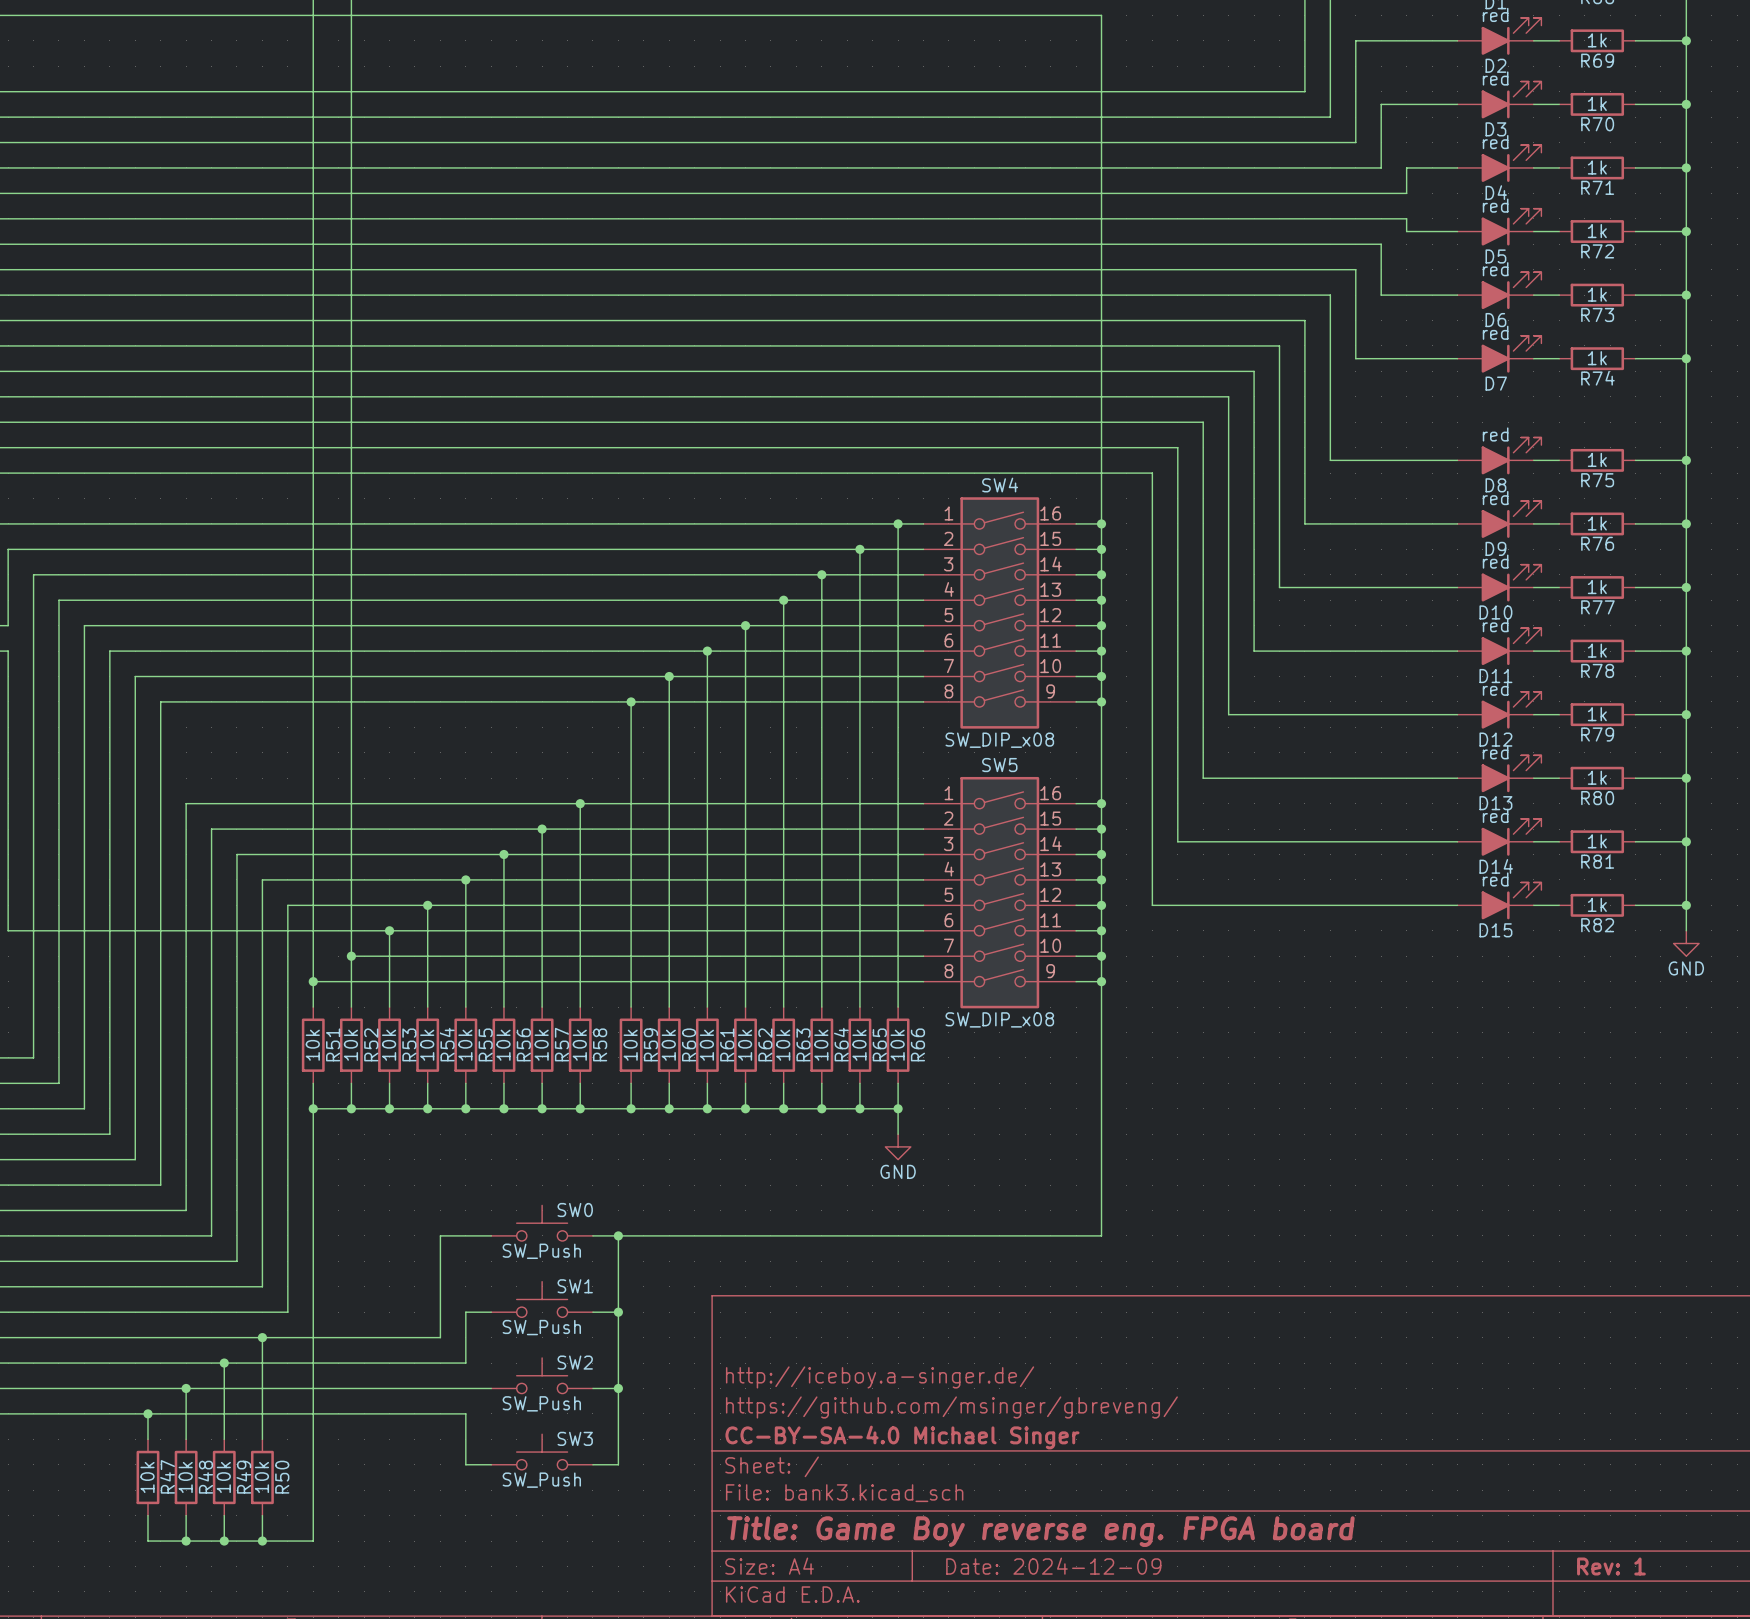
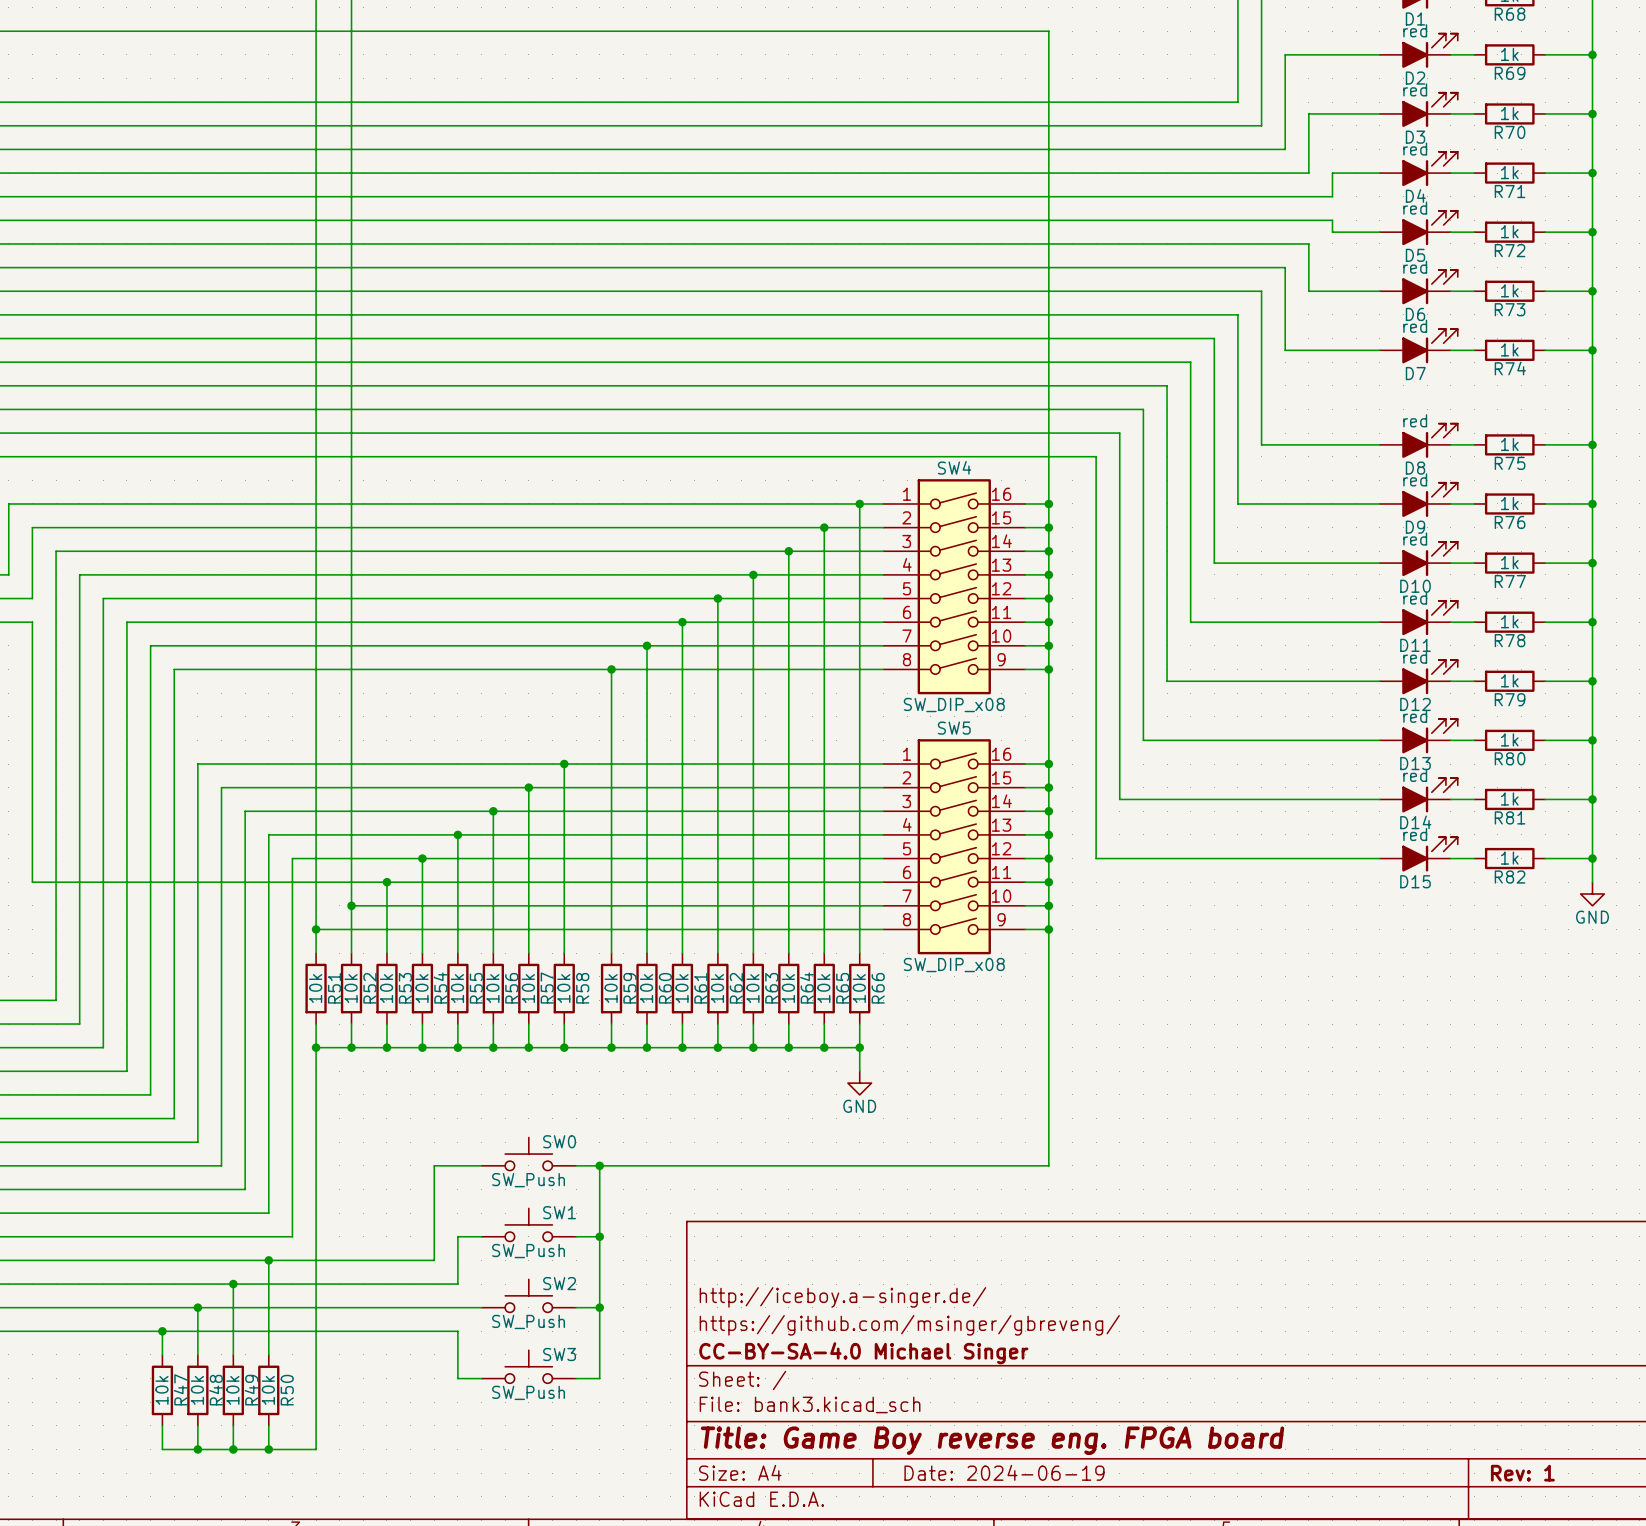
title block: Date: 2024-12-09 (1053, 1566) -> Date: 2024-06-19 (1004, 1472)

